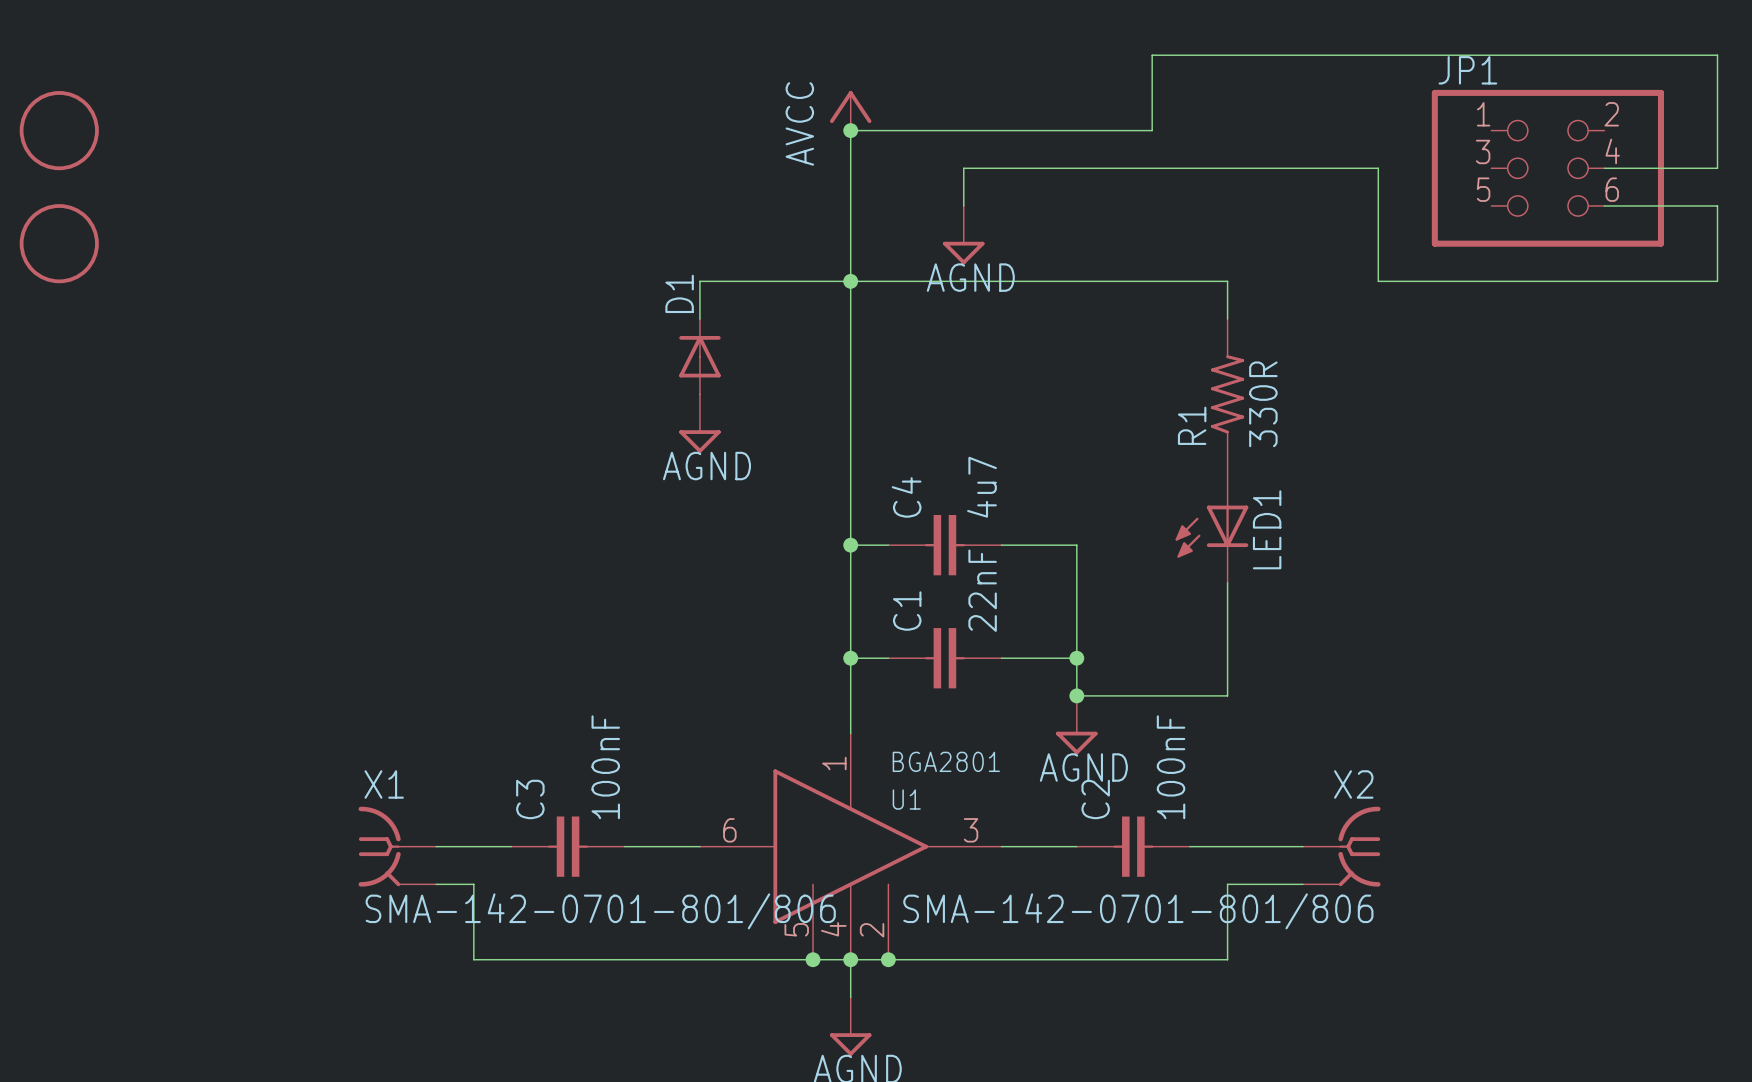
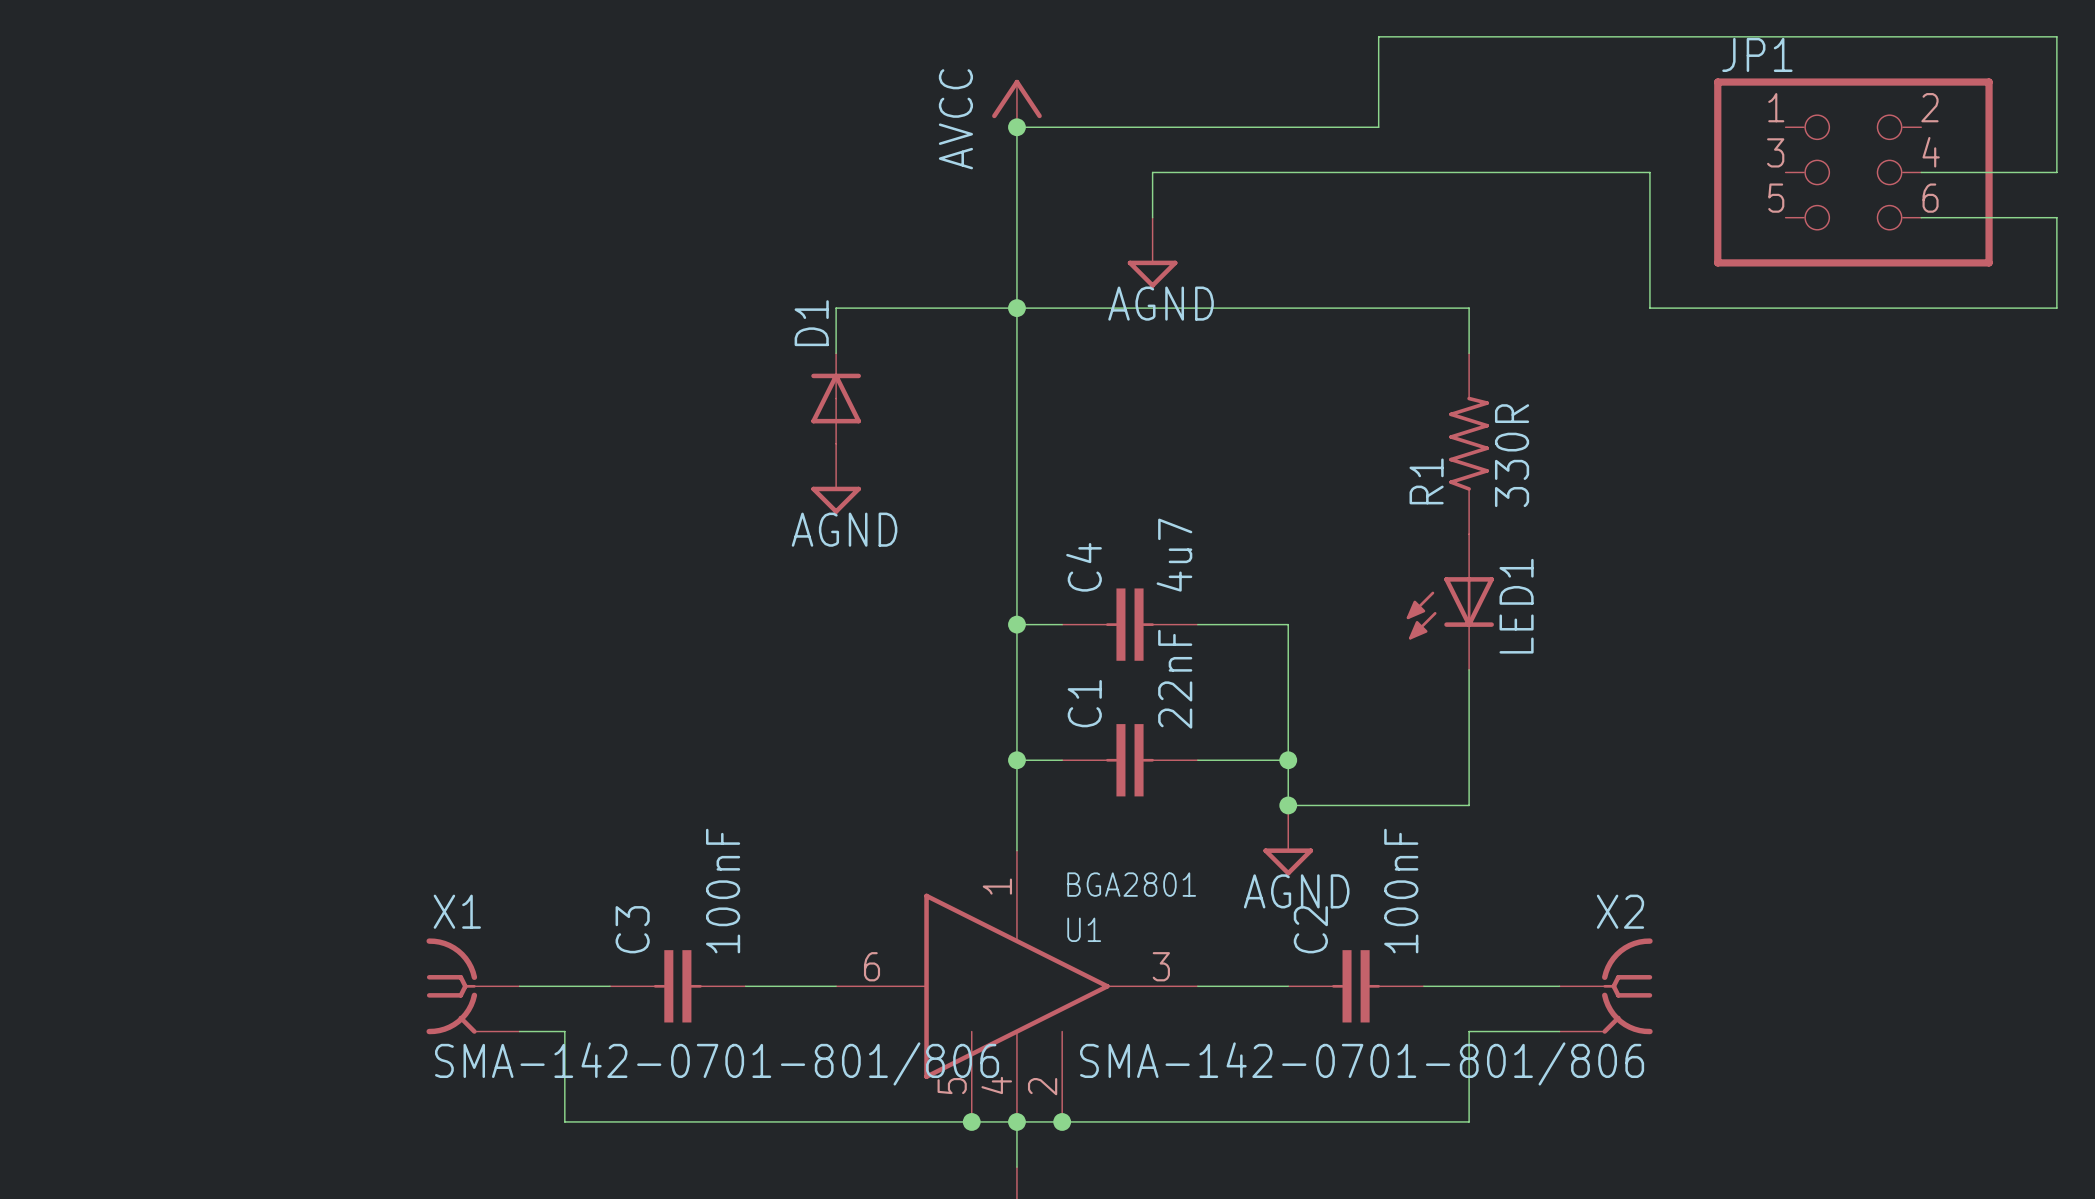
part: (59, 130) -> none
part: (59, 243) -> none

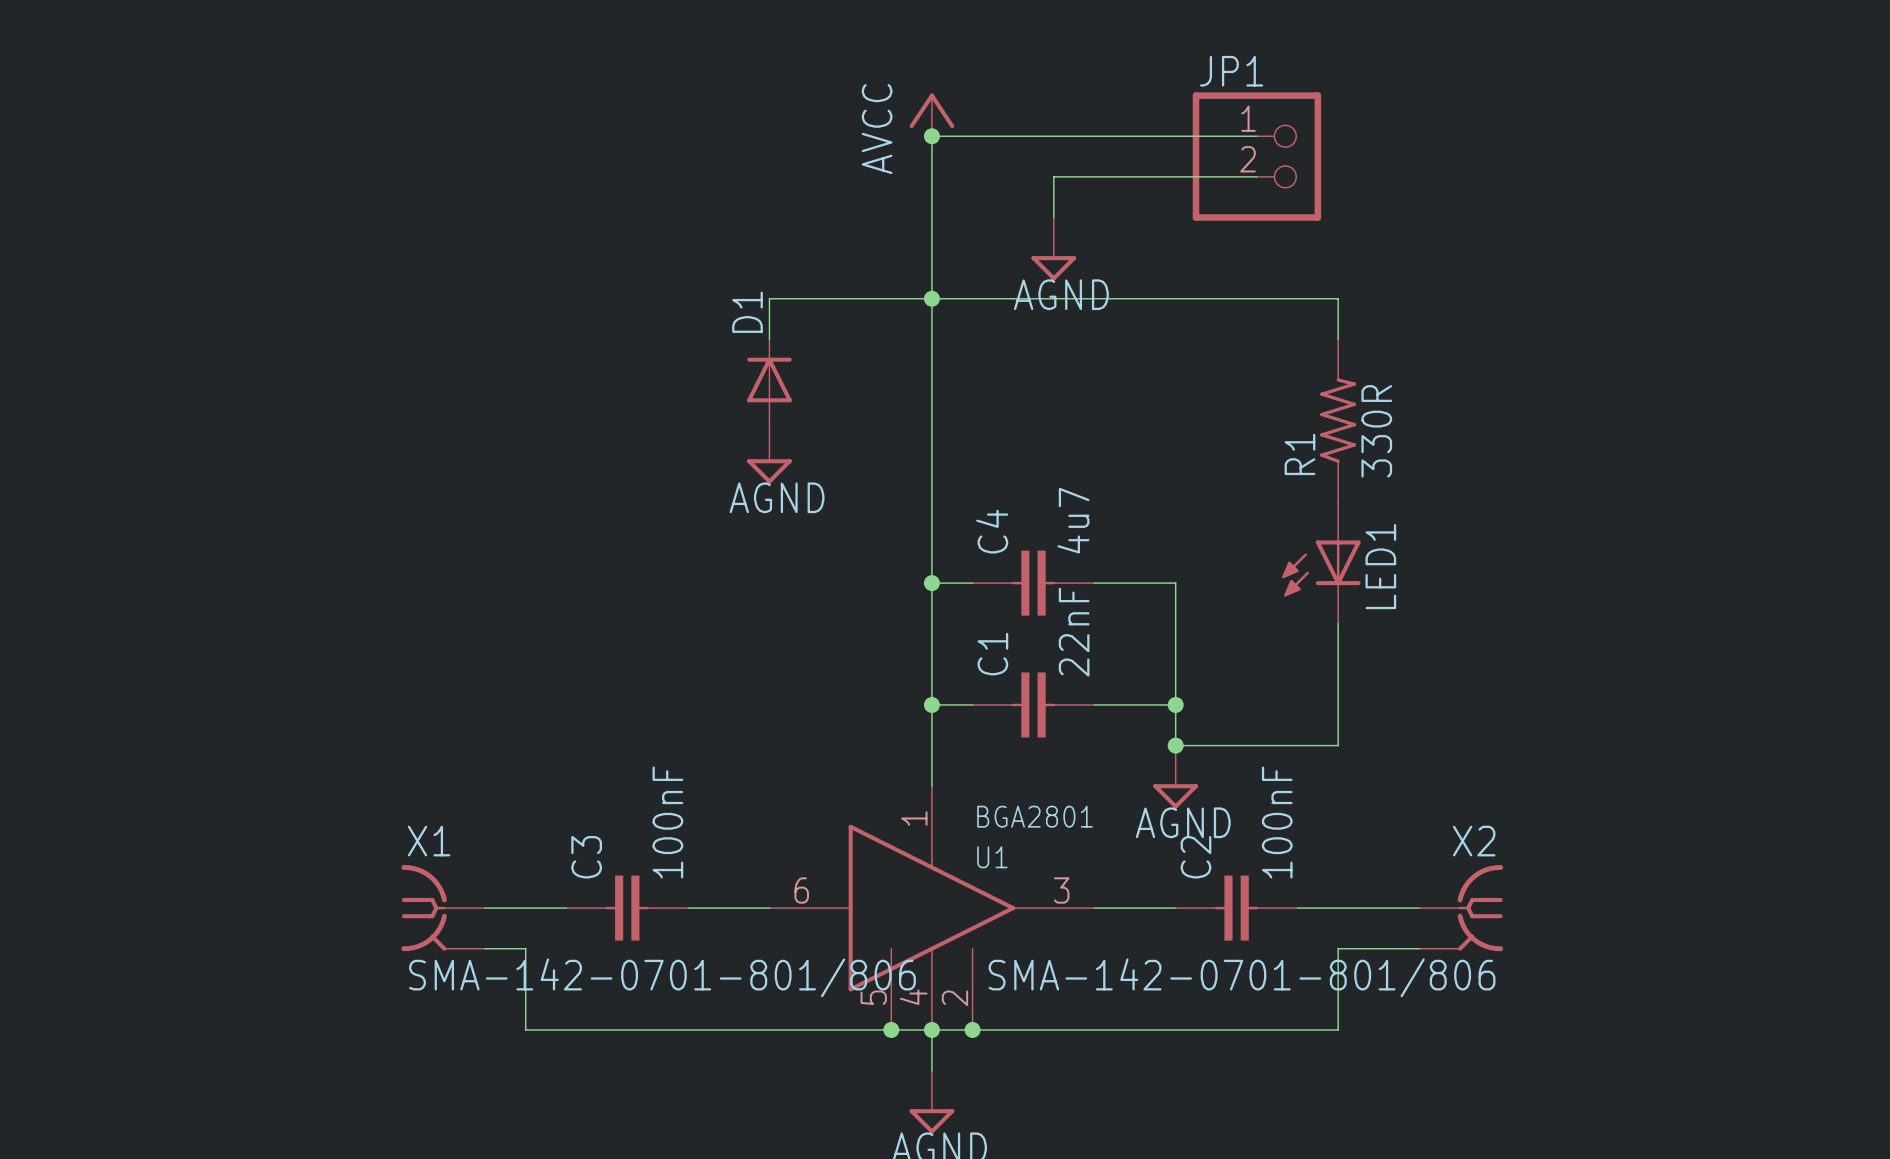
JP1 name position: JP1 (1757, 54) -> JP1 (1231, 71)
JP1 symbol: [1714, 78, 1993, 267] -> [1192, 92, 1322, 221]
wire: (1378, 127) (1378, 36) (2056, 36) (2056, 172) (1921, 172) -> none
wire: (1378, 172) (1649, 172) (1649, 308) (2056, 308) (2056, 217) (1921, 217) -> none

